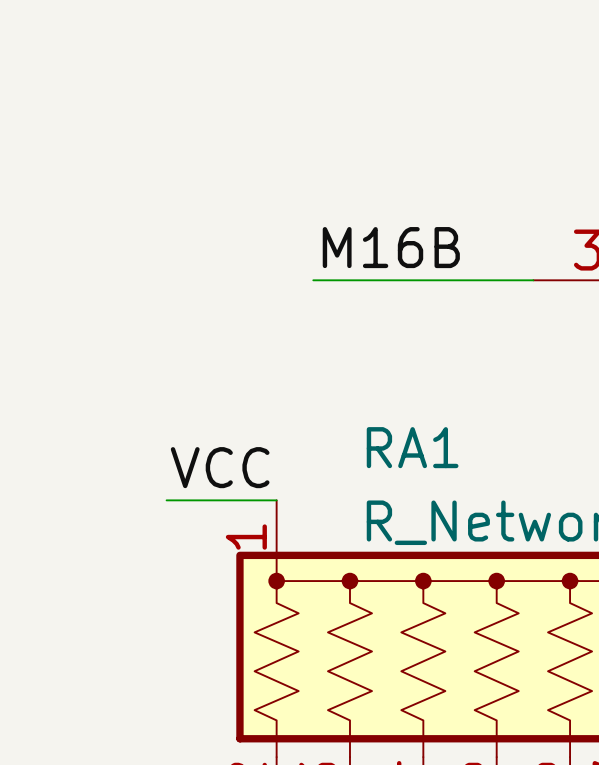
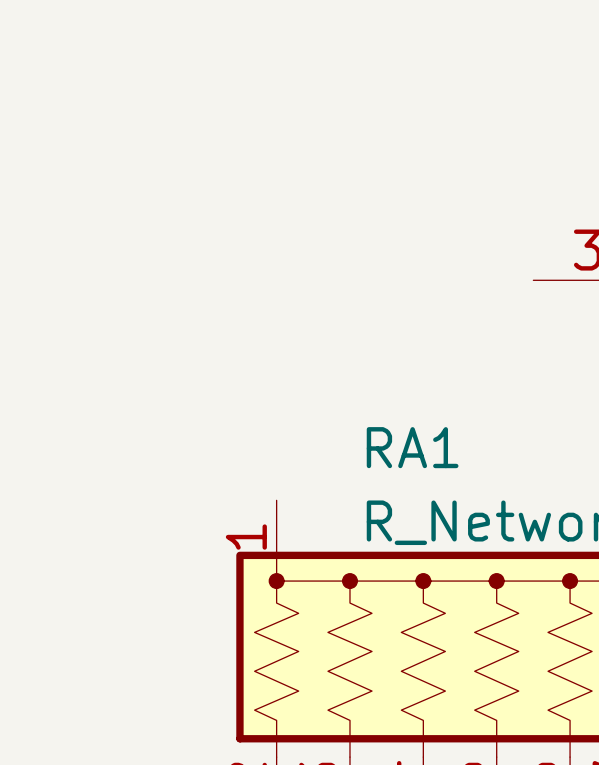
label: M16B (391, 247) -> none
wire: (313, 280) (533, 280) -> none
label: VCC (220, 467) -> none
wire: (166, 500) (276, 500) -> none

